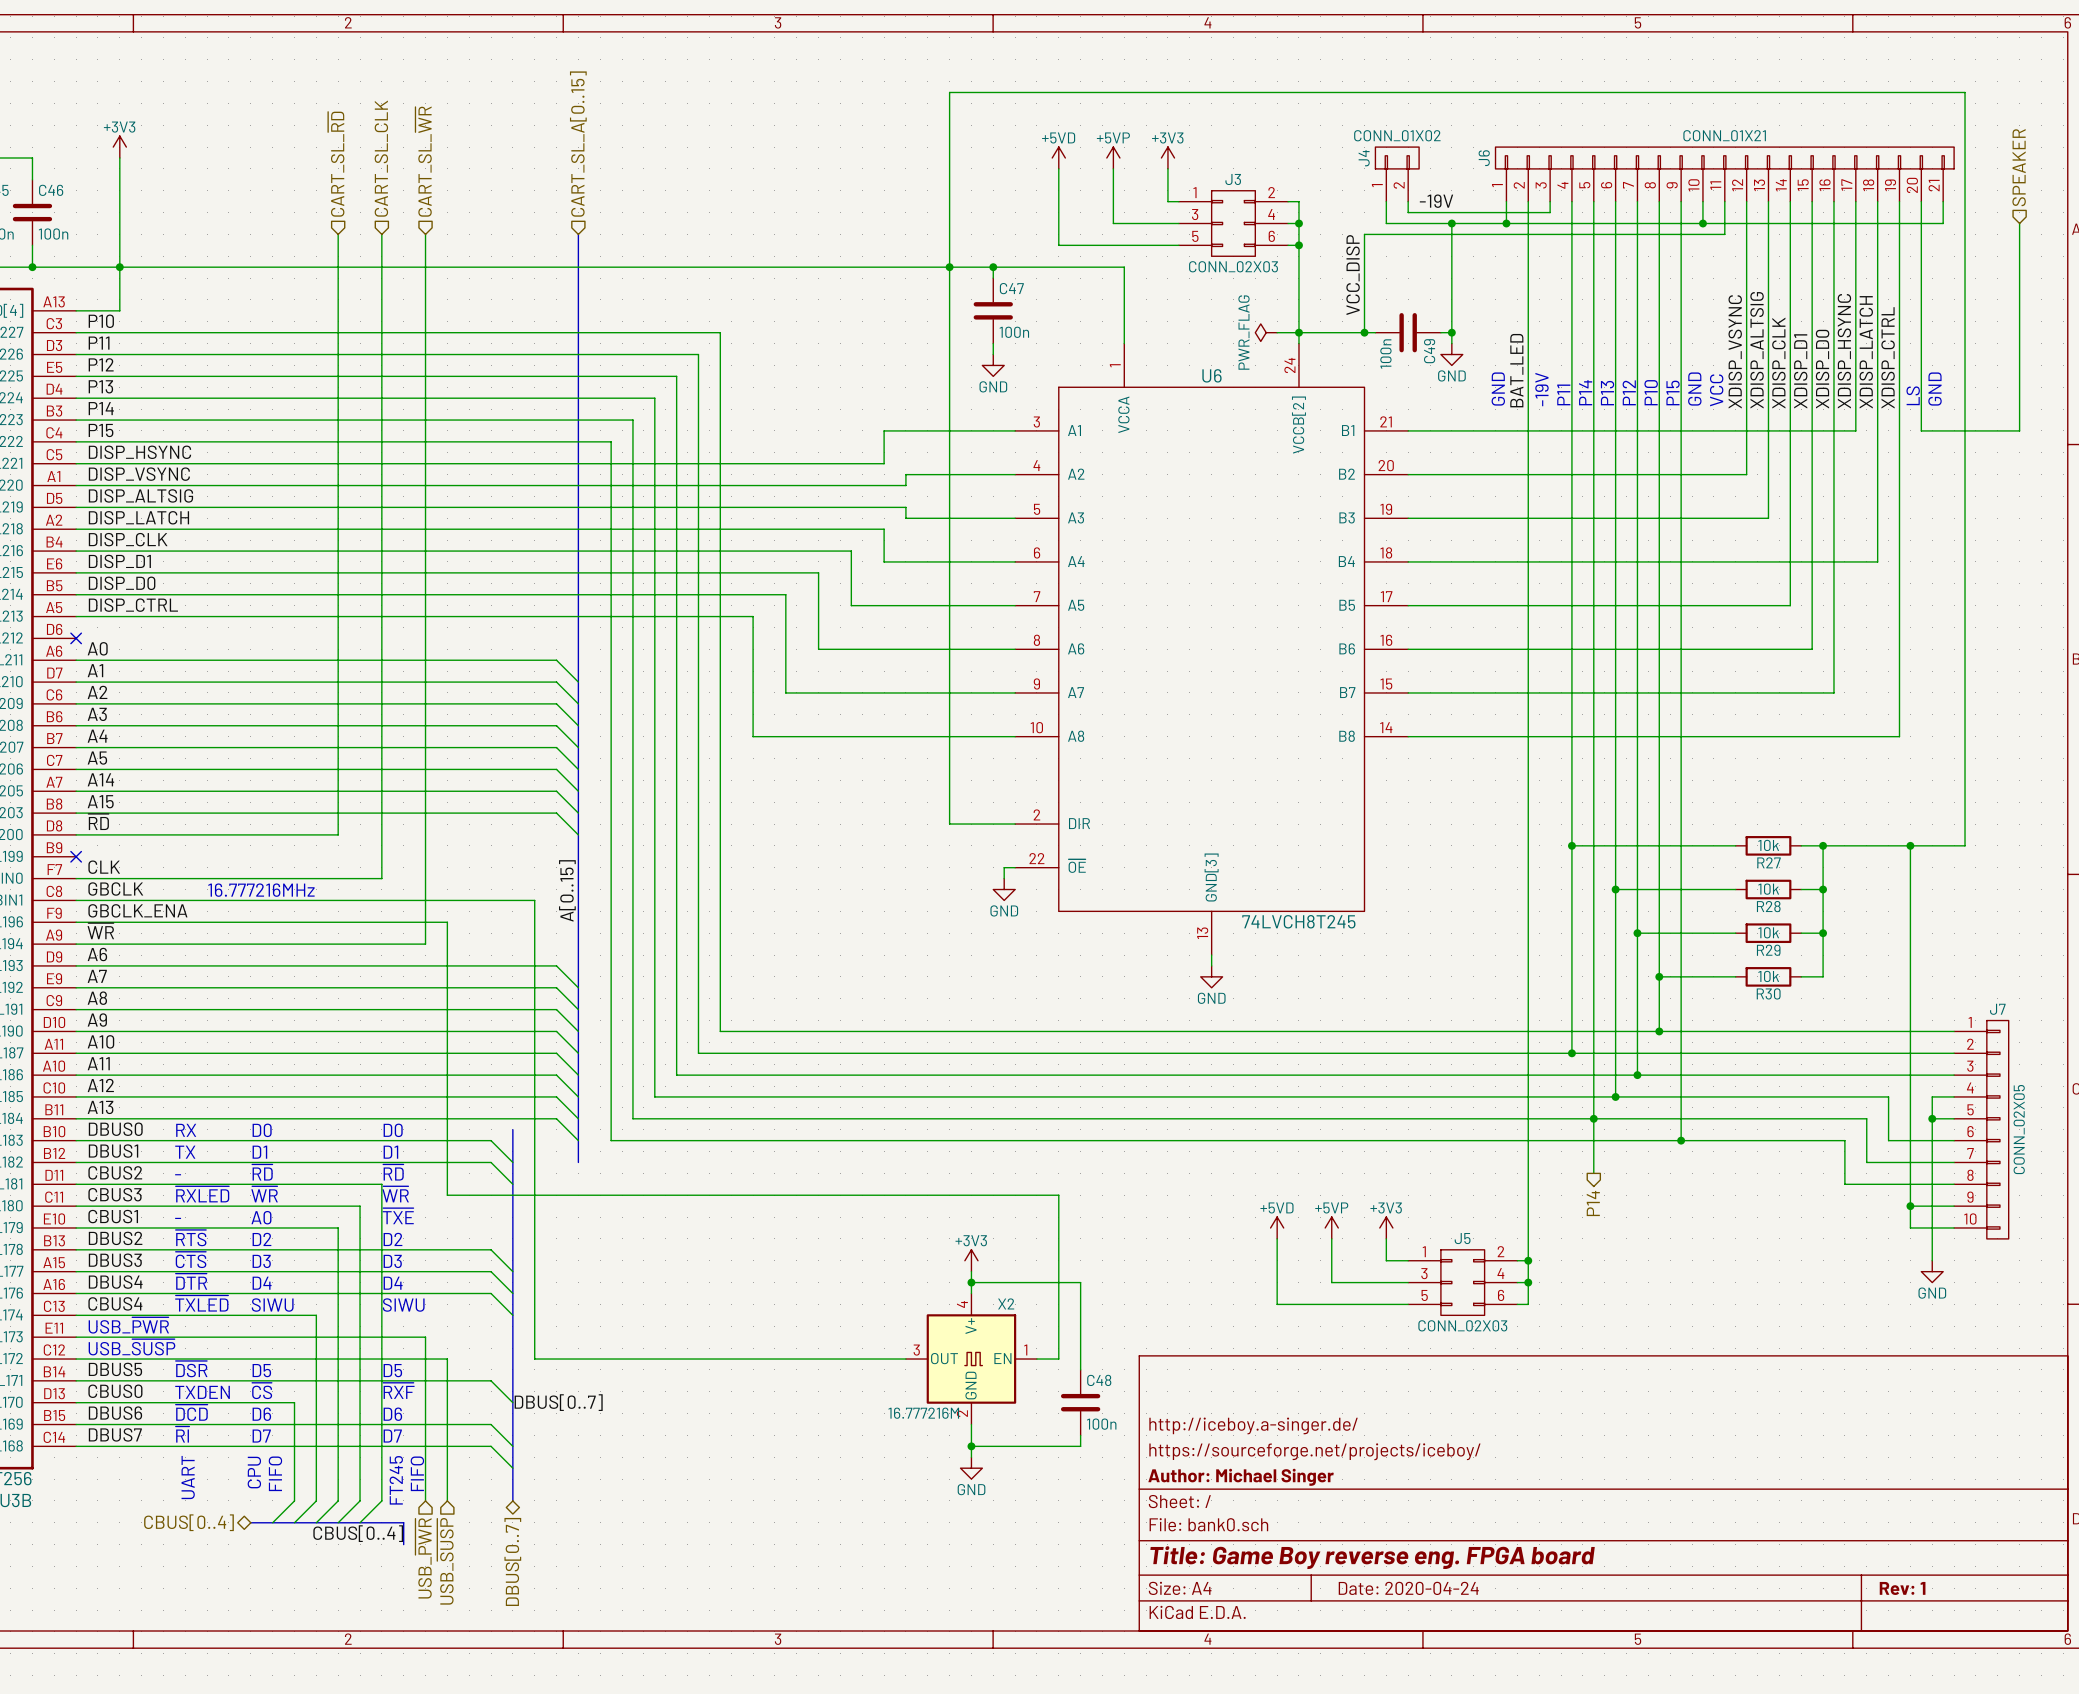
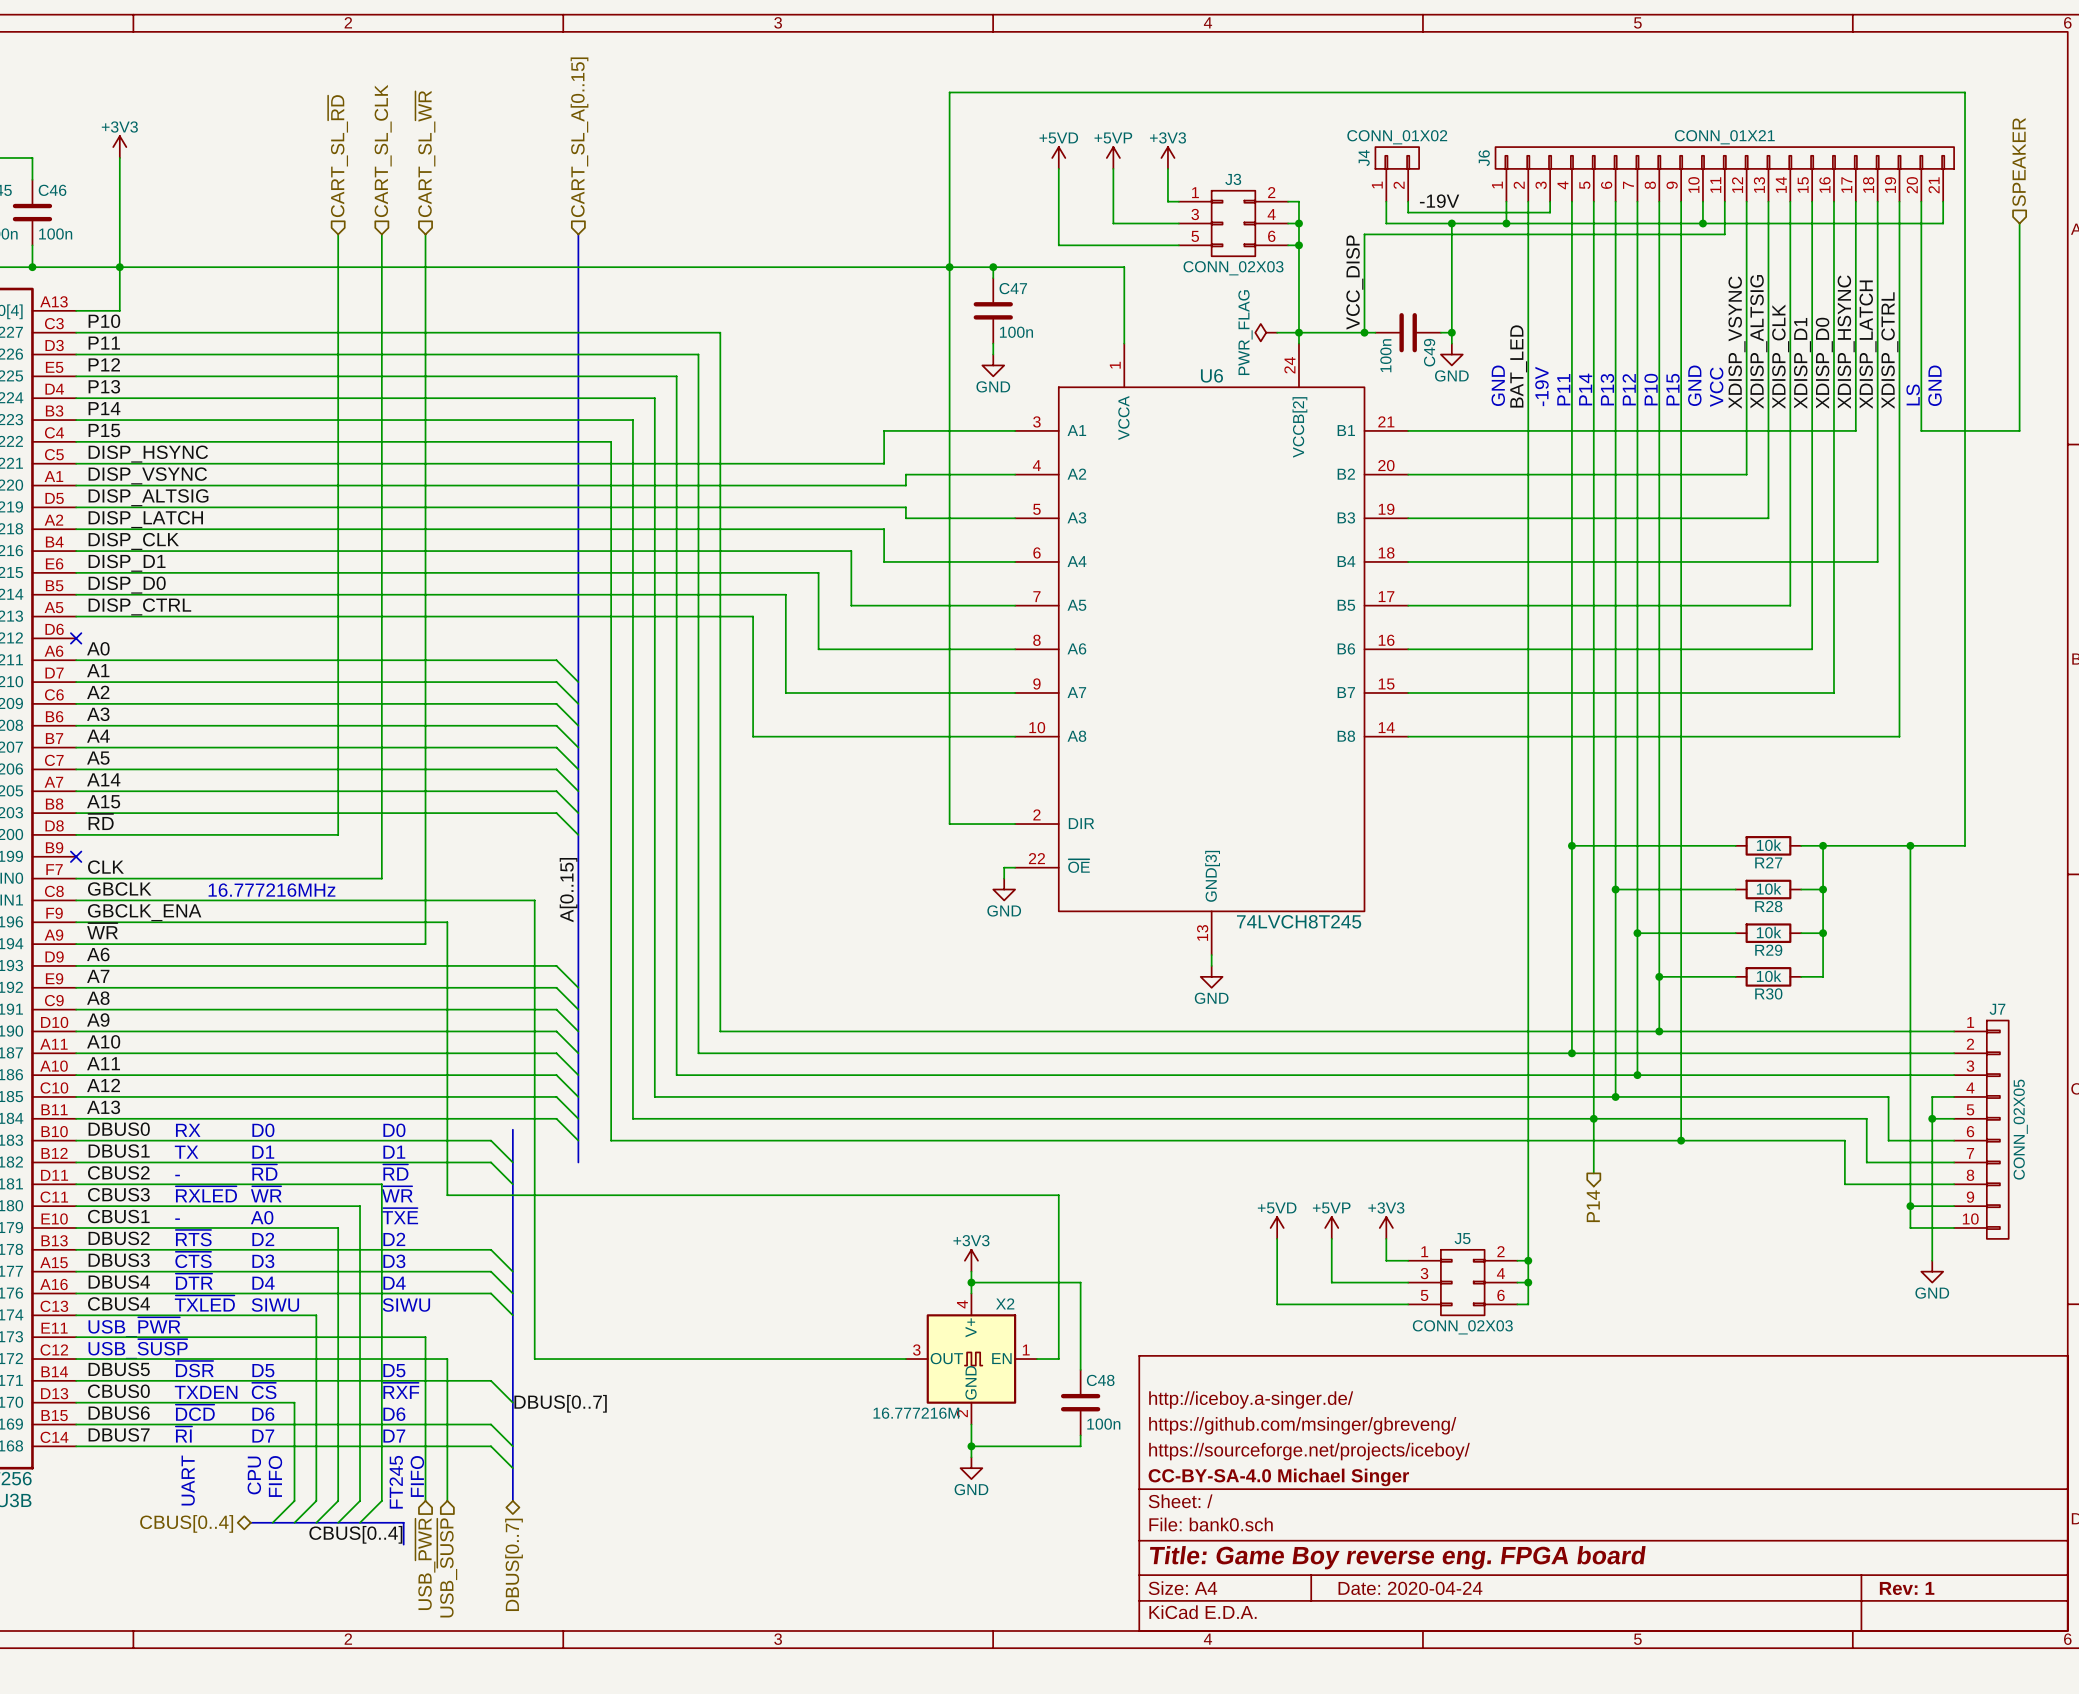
title block: none -> http://iceboy.a-singer.de/ (1251, 1399)
title block: http://iceboy.a-singer.de/ (1253, 1425) -> https://github.com/msinger/gbreveng/ (1302, 1425)
title block: Author: Michael Singer (1241, 1477) -> CC-BY-SA-4.0 Michael Singer (1278, 1477)

